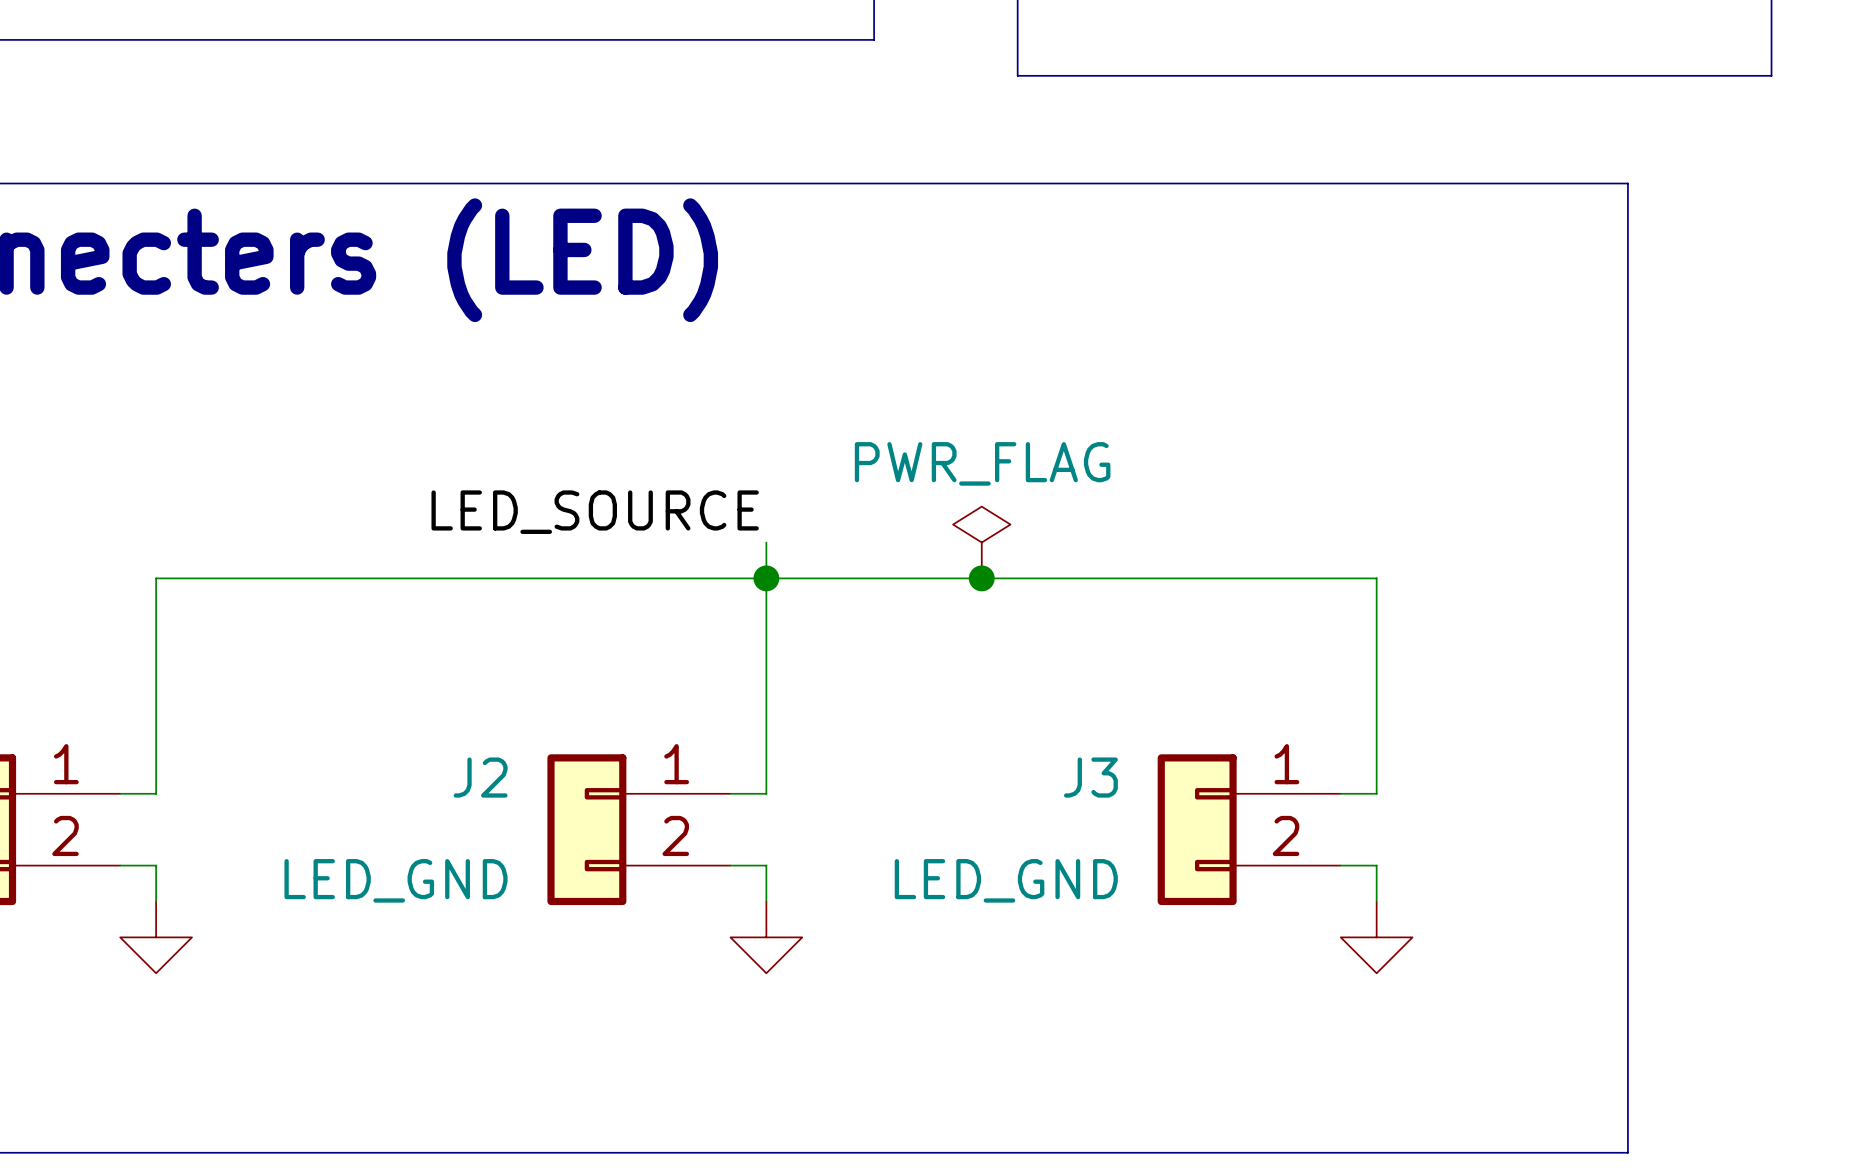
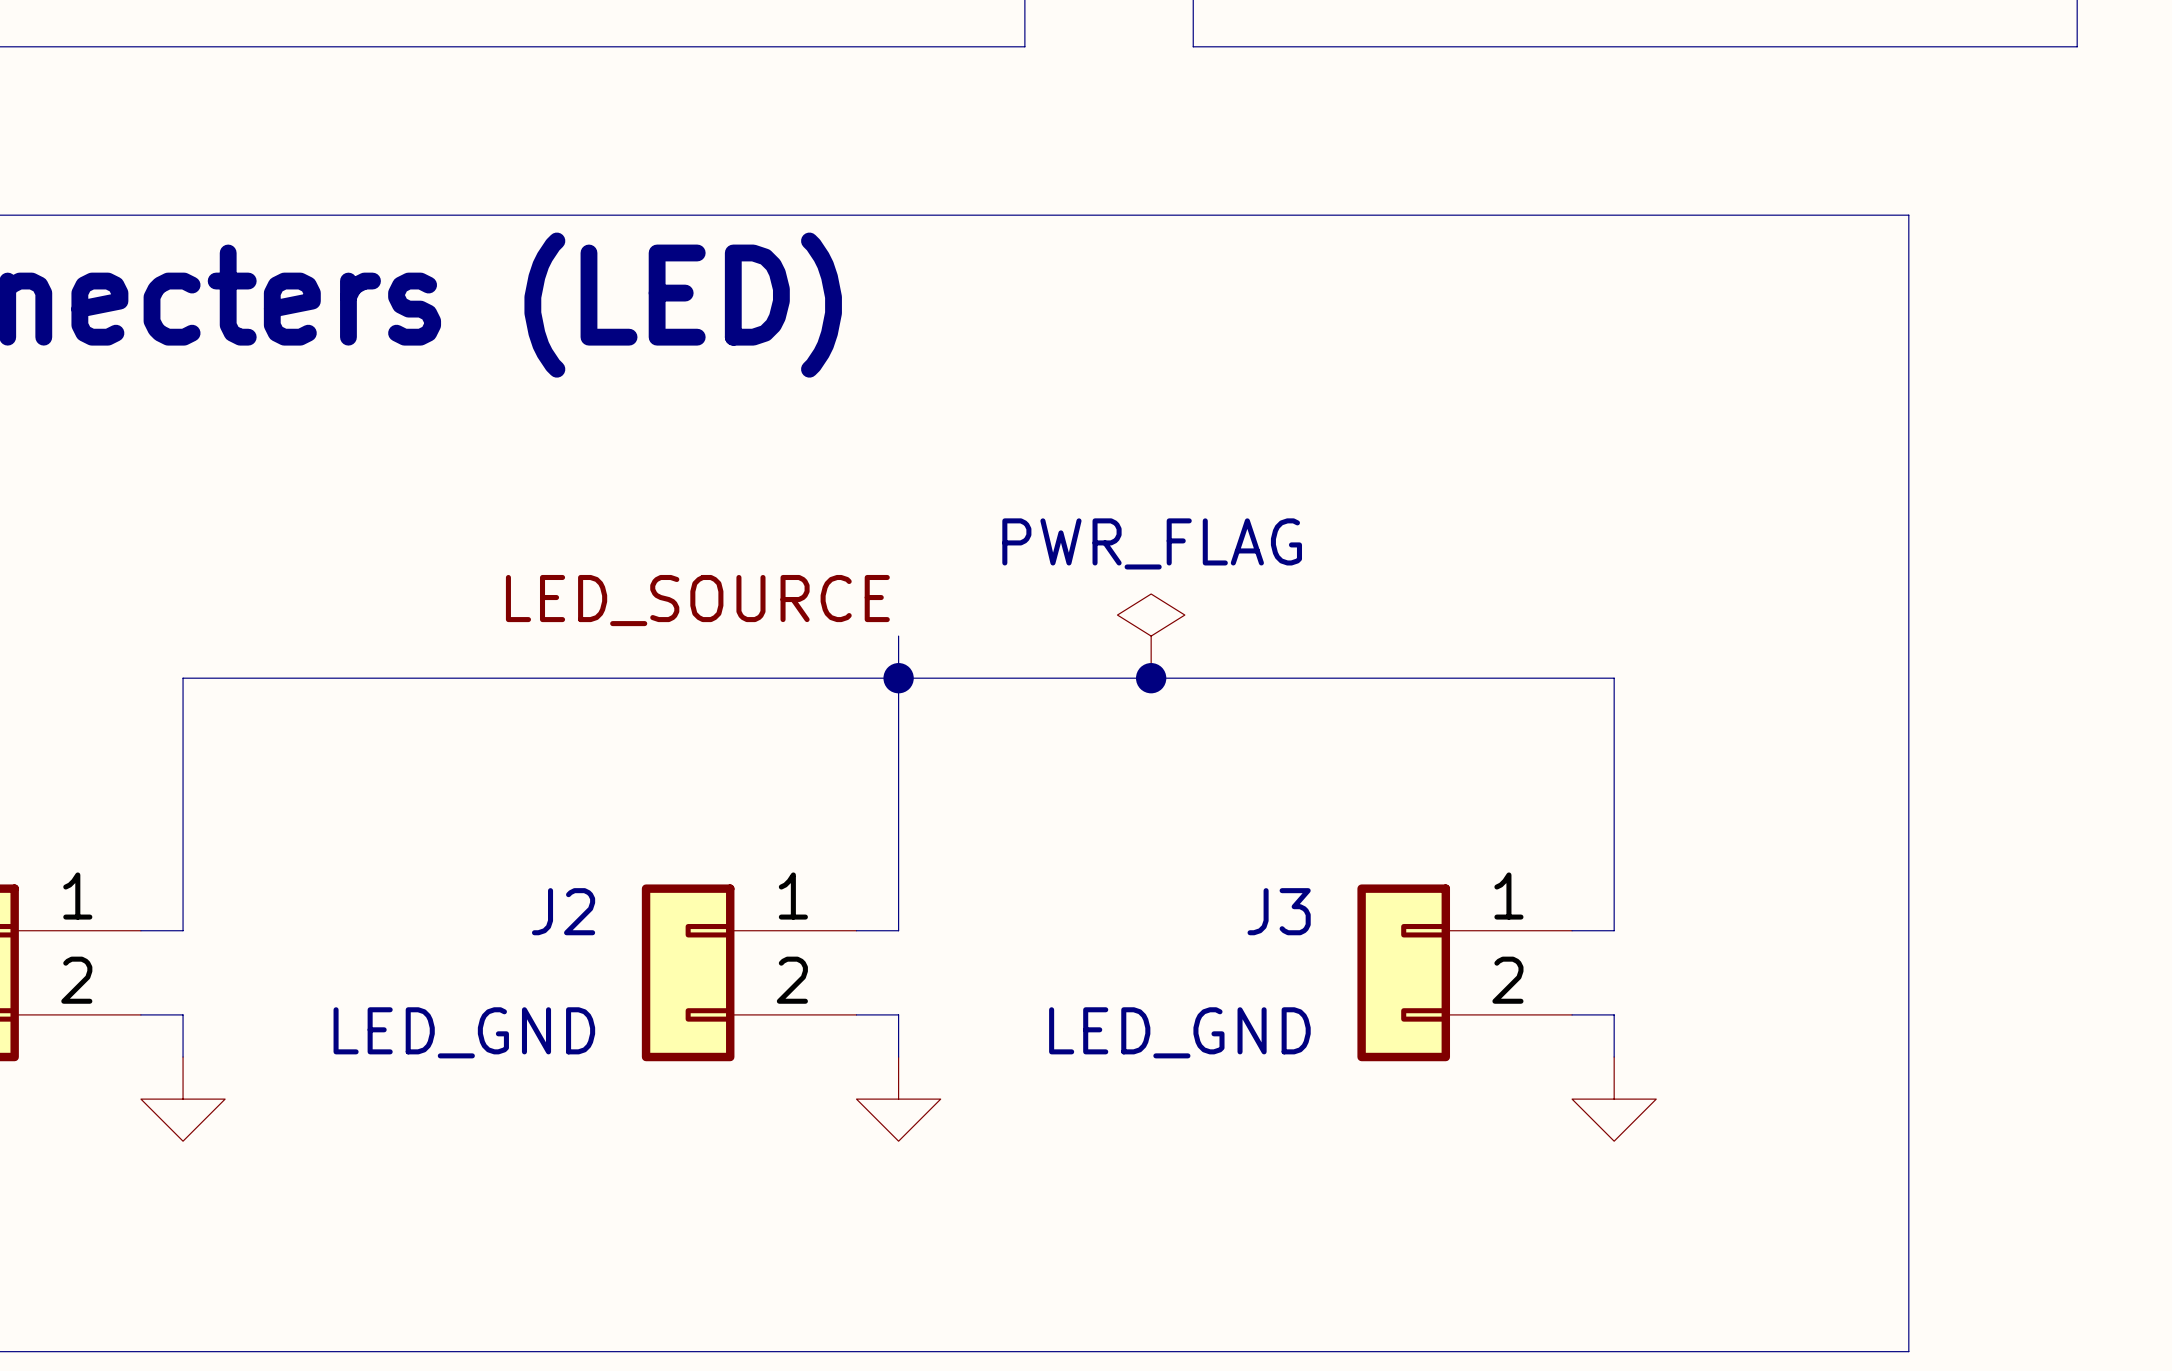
line: (1017, 39) (1017, 75) (1771, 75) (1771, 39) -> (1193, 46) (2077, 46)

